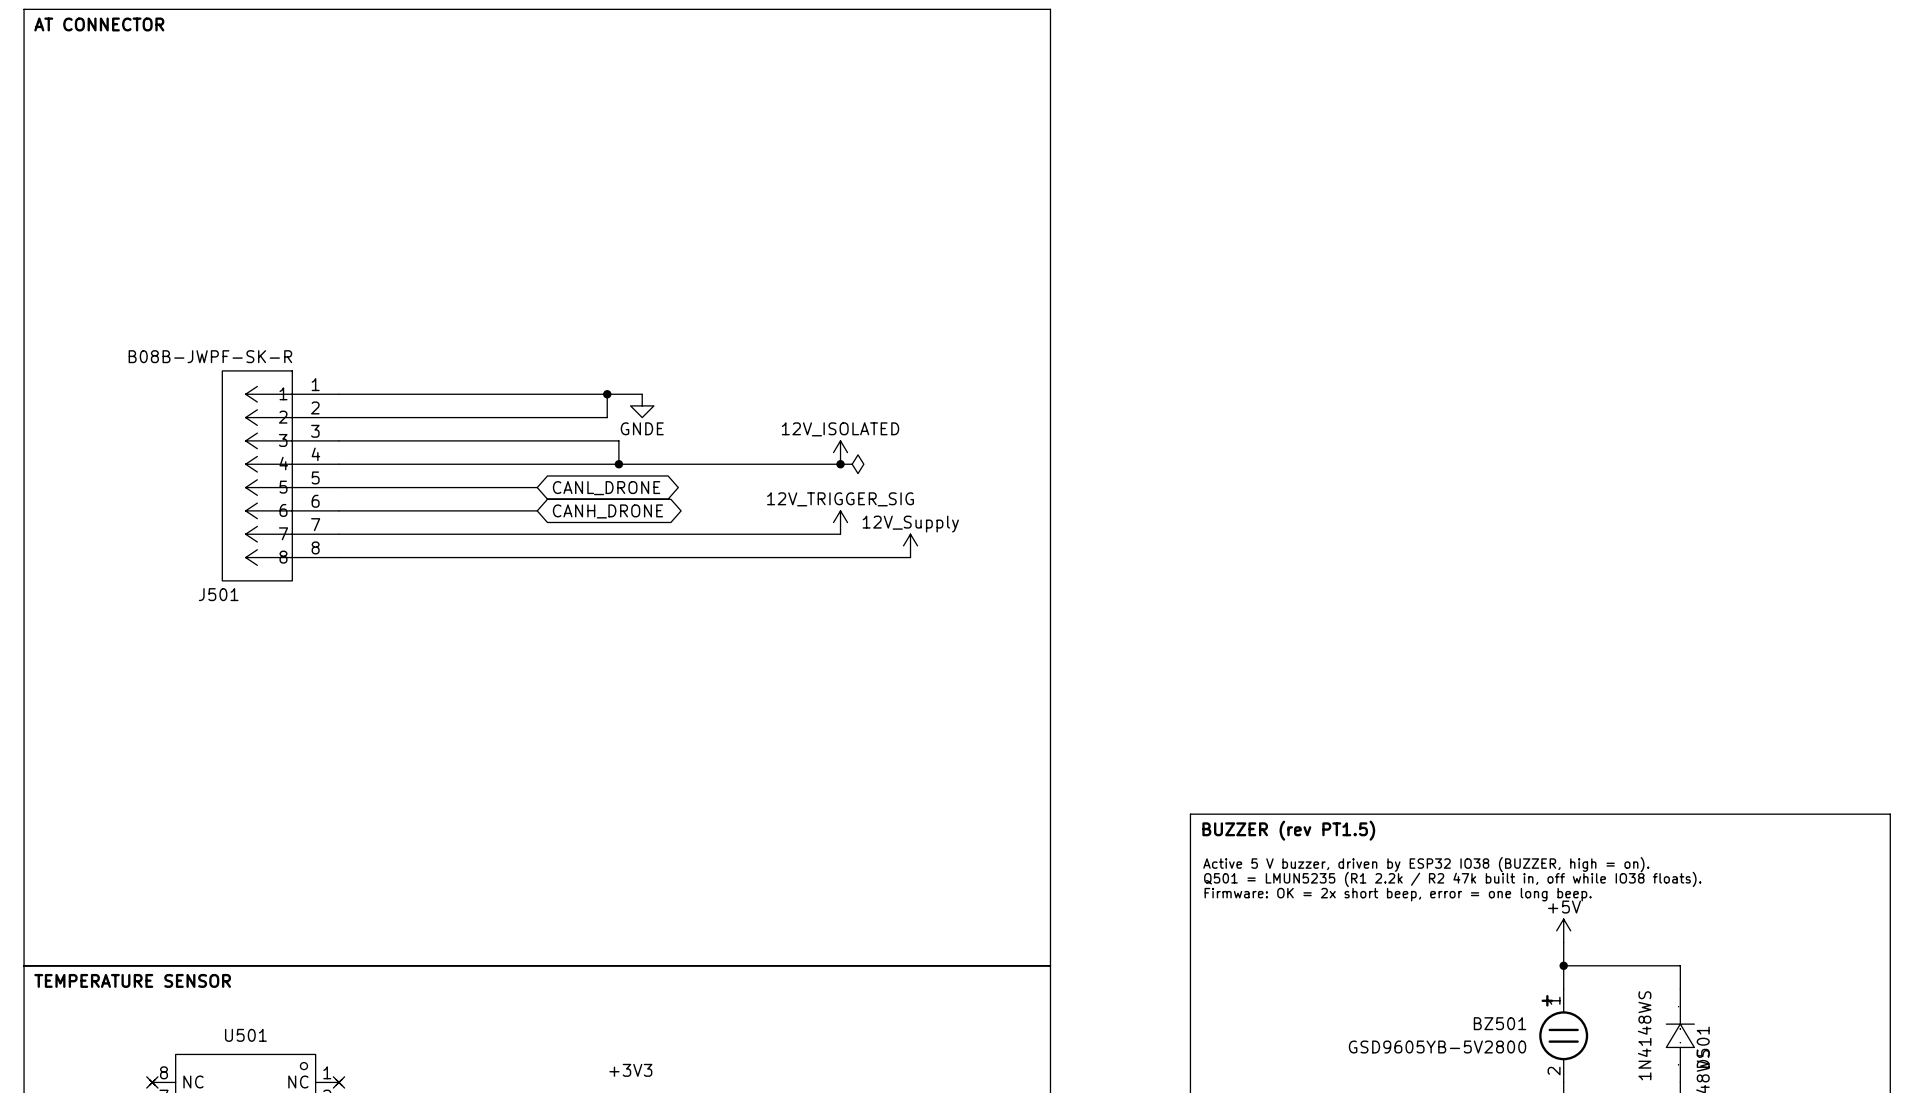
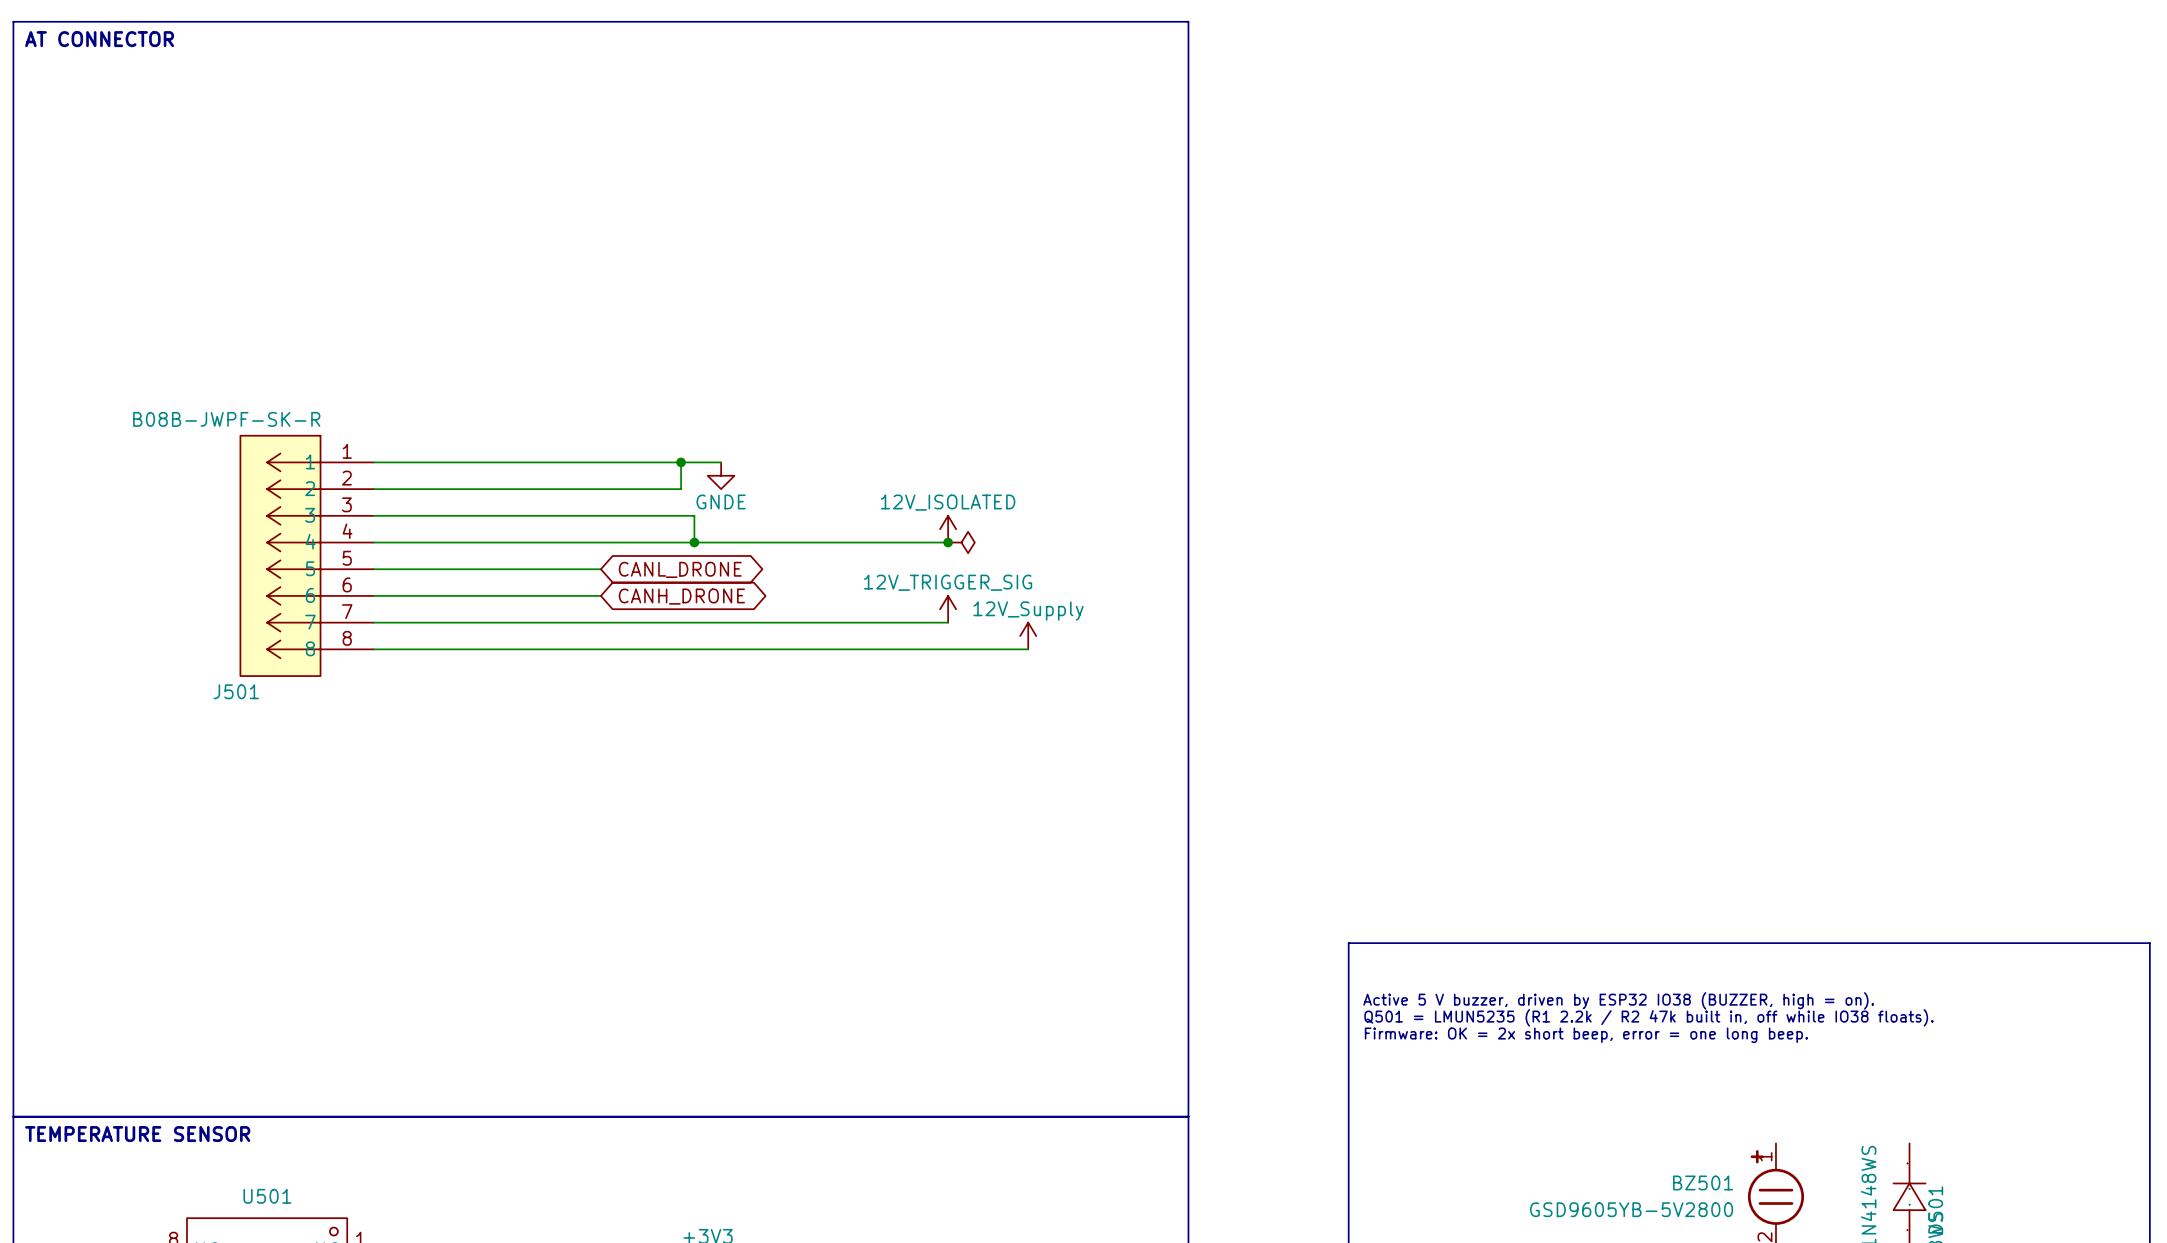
text: BUZZER (rev PT1.5) (1288, 830) -> none
power symbol: +5V (1563, 930) -> none
wire: (1563, 942) (1563, 989) -> none
wire: (1563, 965) (1680, 965) (1680, 989) -> none
junction: (1563, 965) -> none

